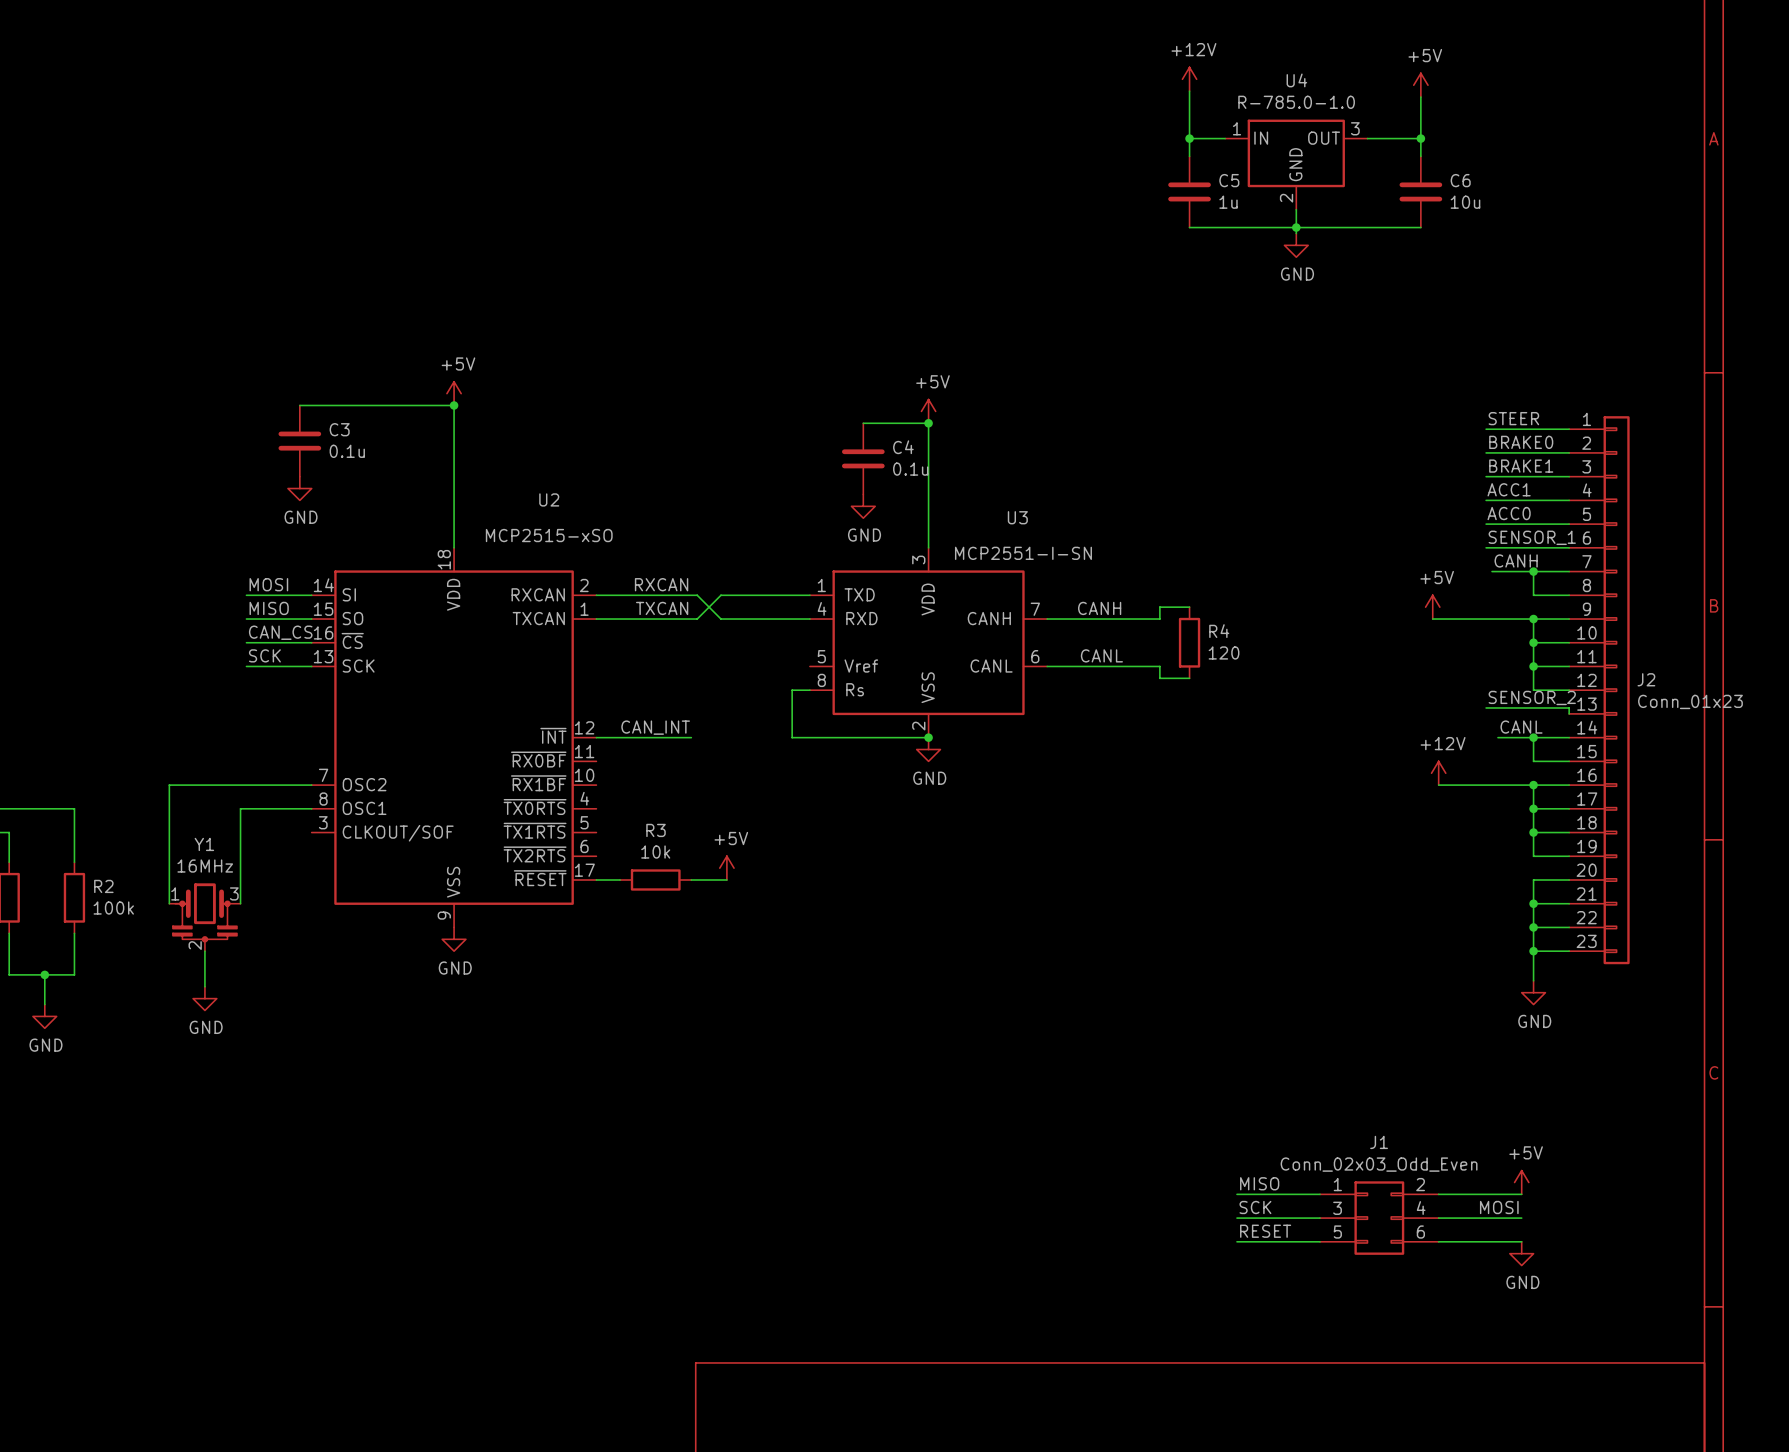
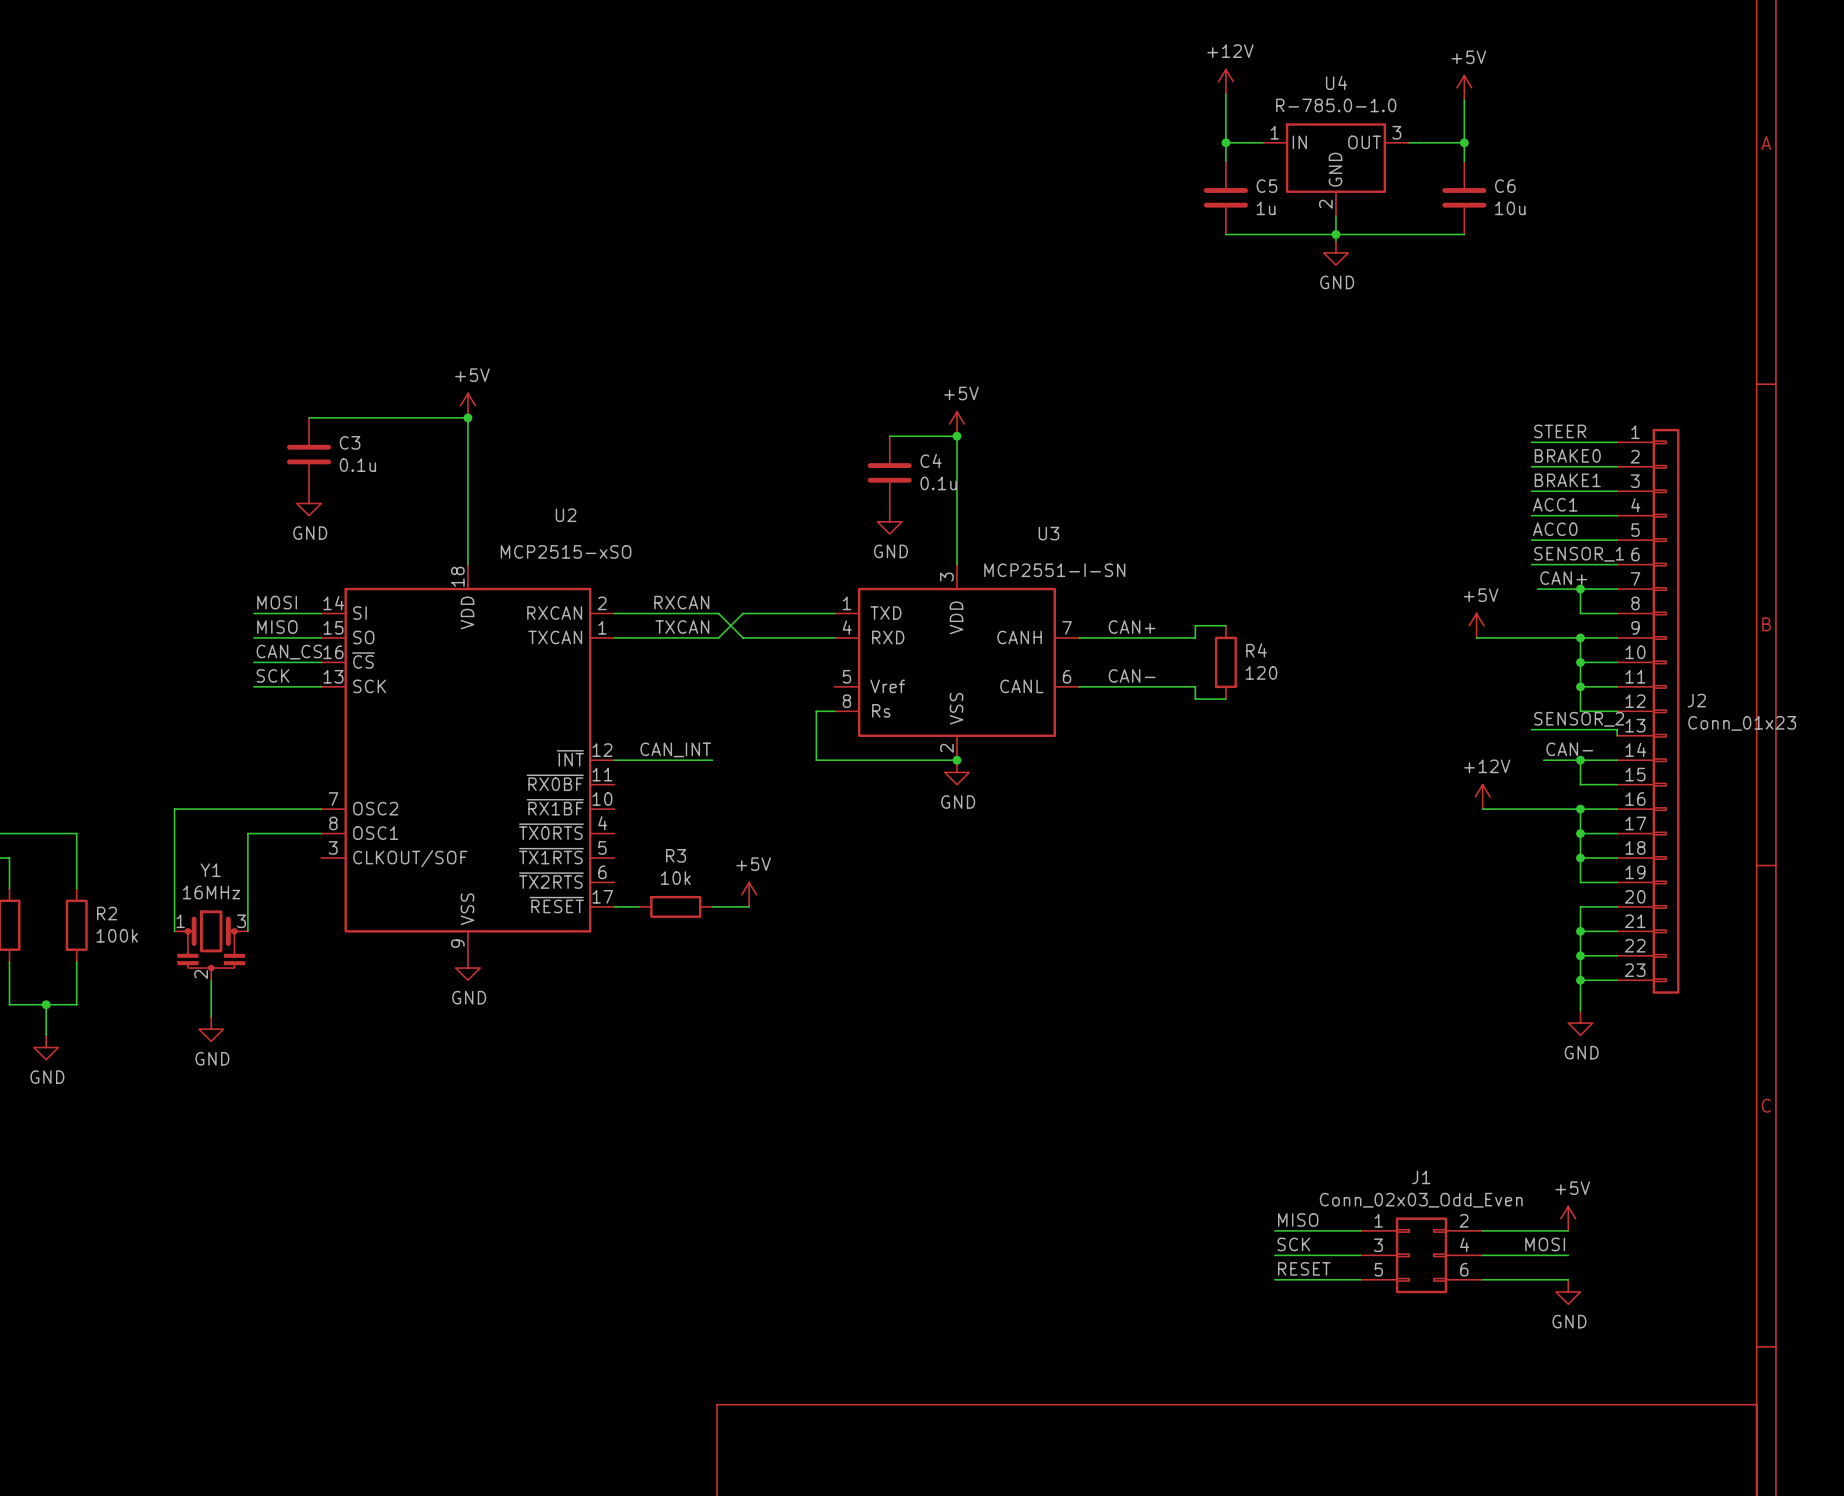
label: CANH (1516, 560) -> CAN+ (1563, 578)
label: CANH (1099, 608) -> CAN+ (1132, 627)
label: CANL (1101, 655) -> CAN- (1132, 675)
label: CANL (1521, 727) -> CAN- (1569, 749)

